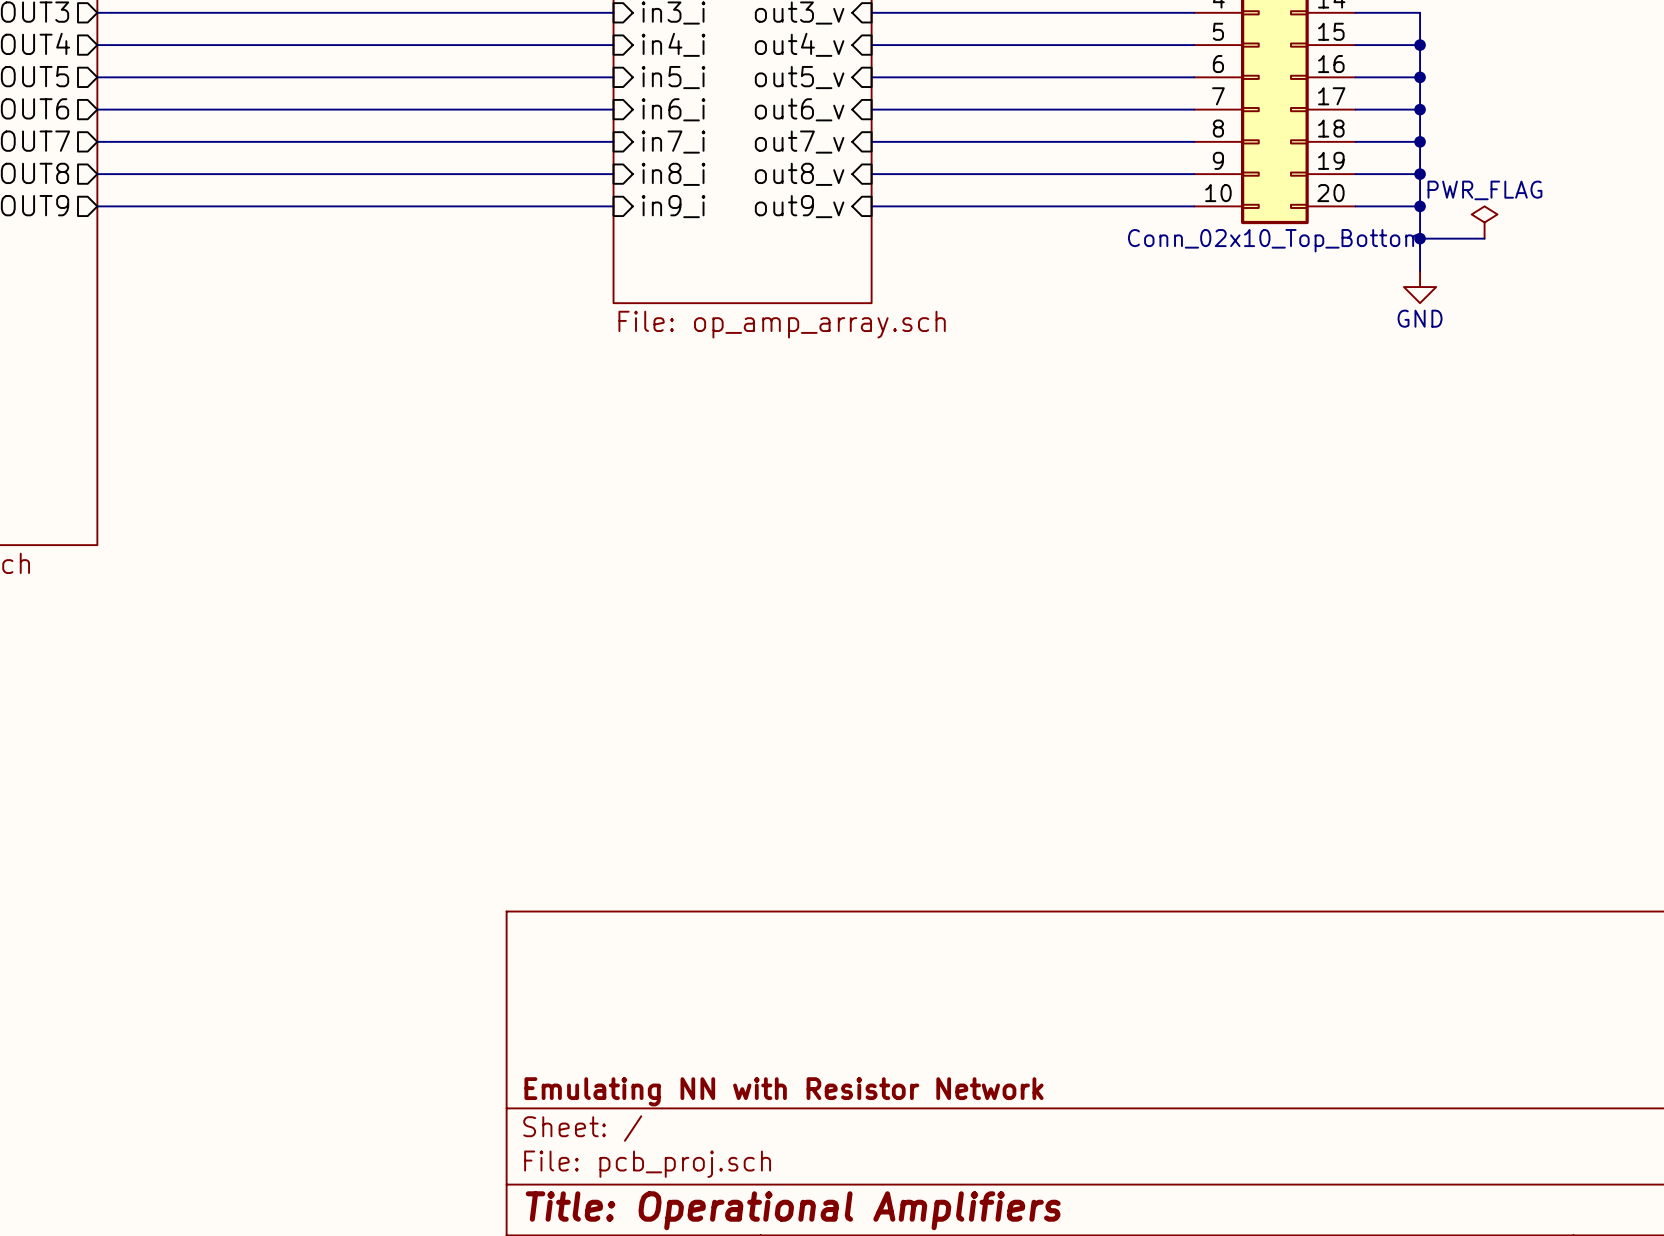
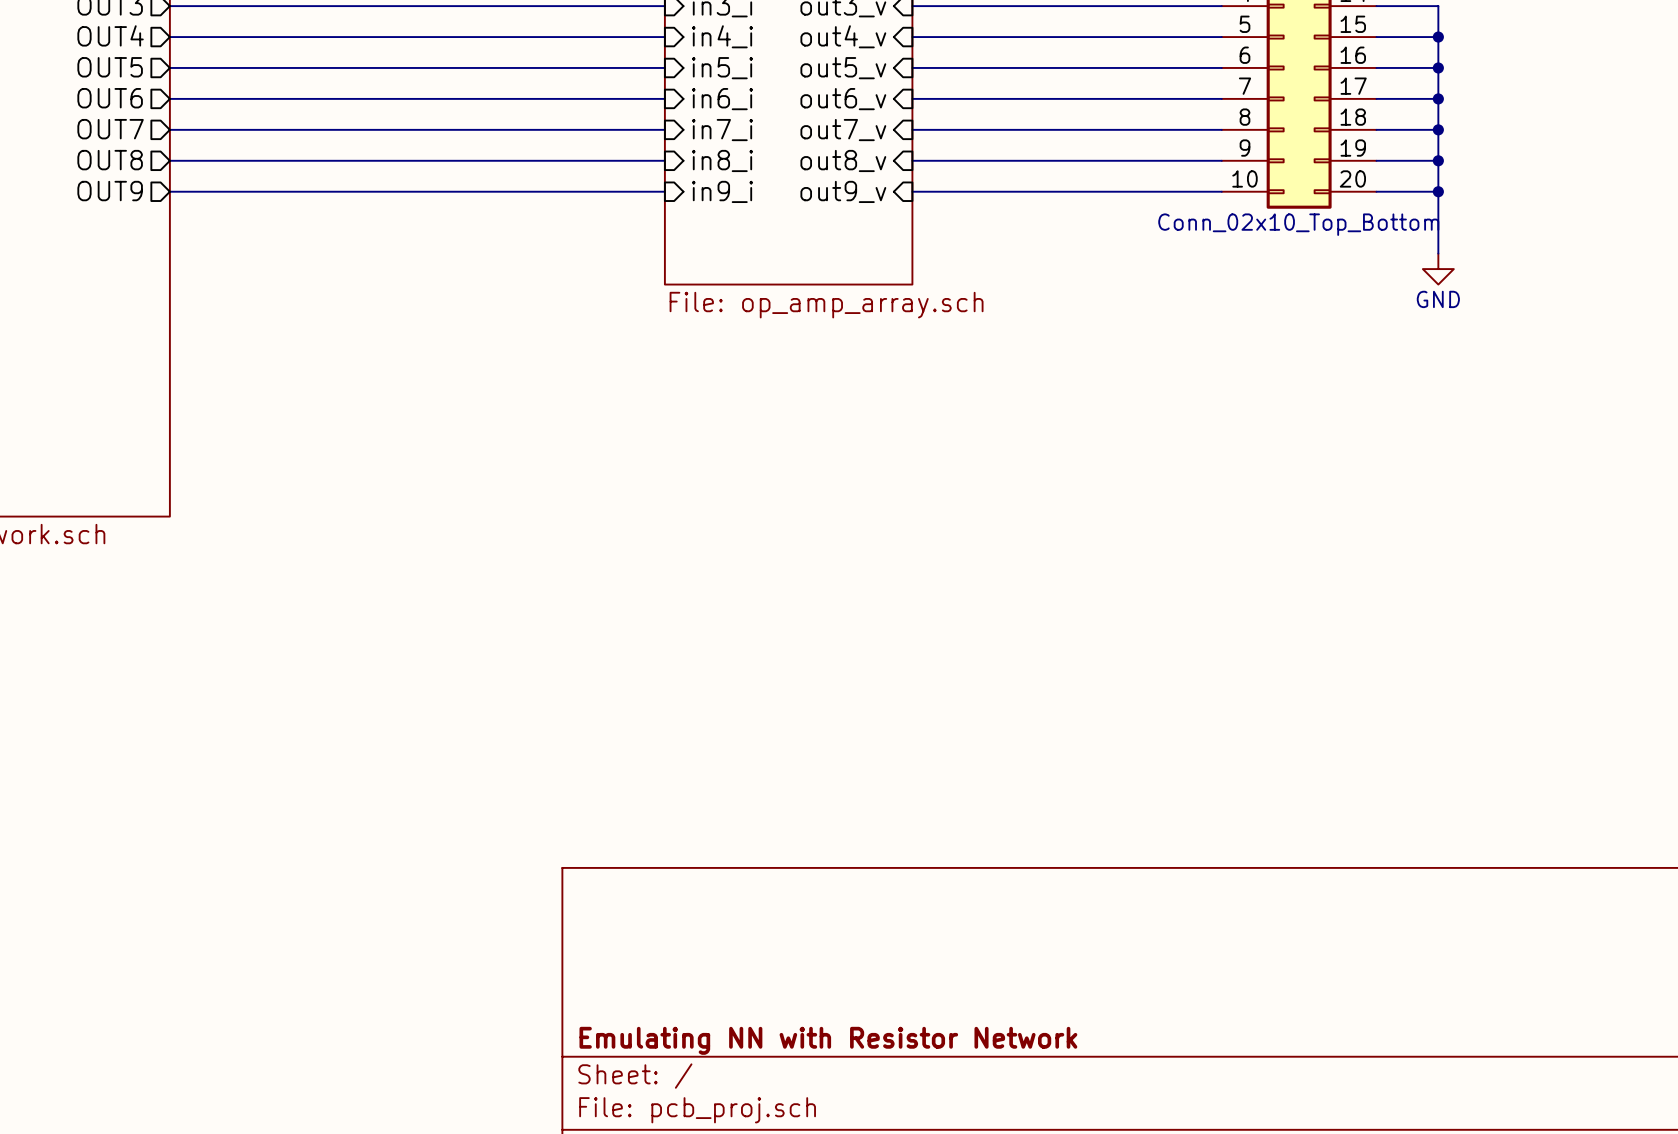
power symbol: PWR_FLAG (1484, 222) -> none
wire: (1420, 238) (1484, 238) -> none
junction: (1420, 238) -> none

